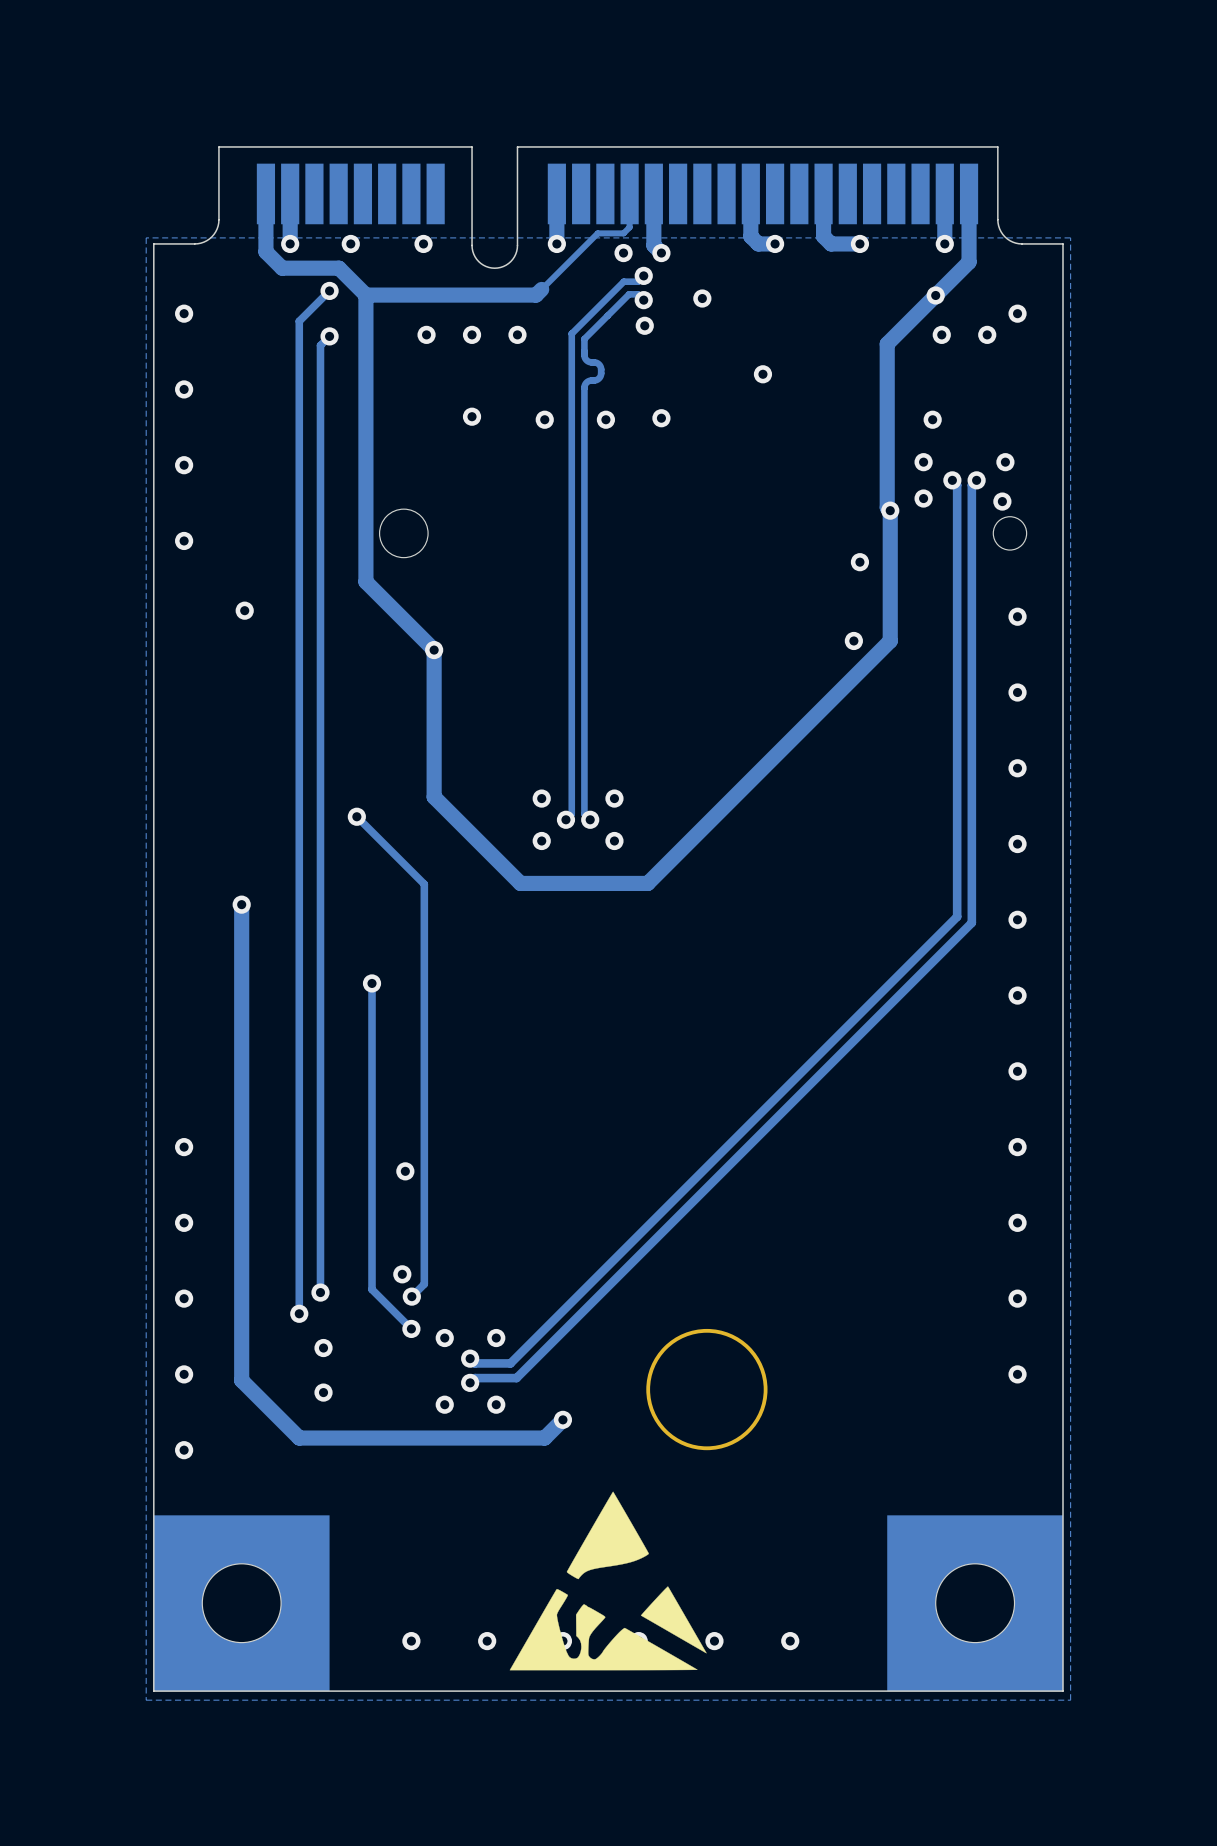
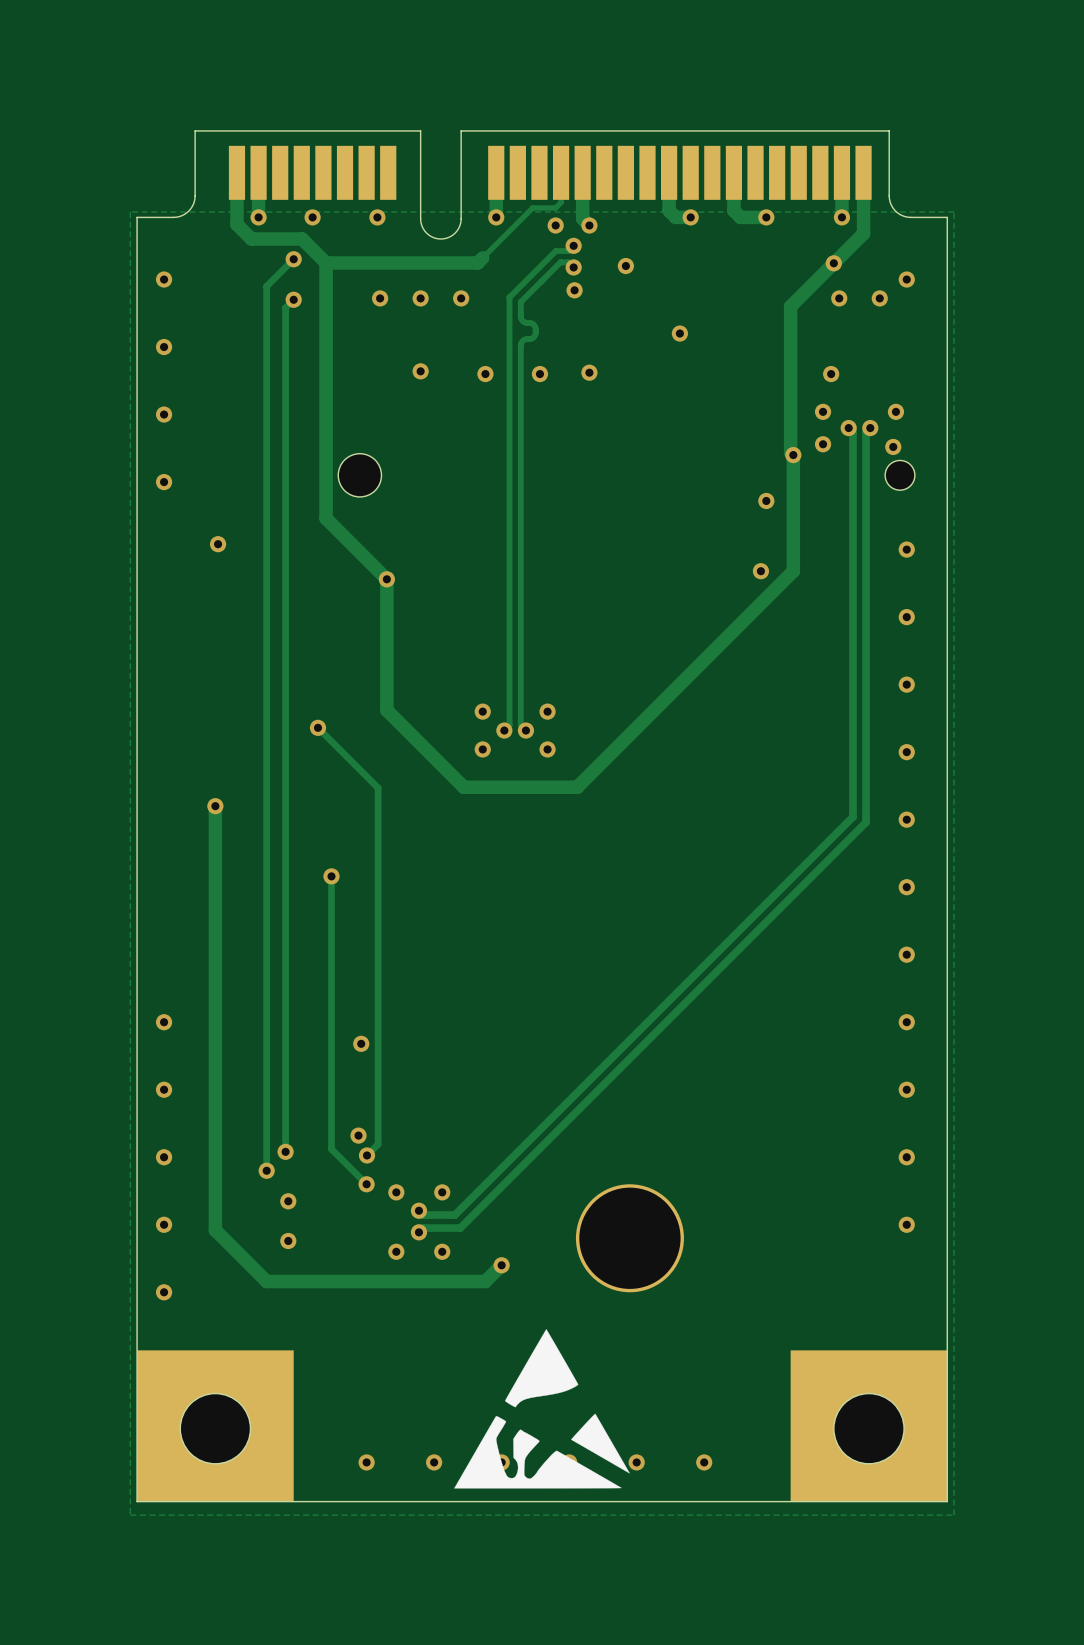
part footprint: [153, 146, 1064, 1692] -> [136, 130, 948, 1503]

